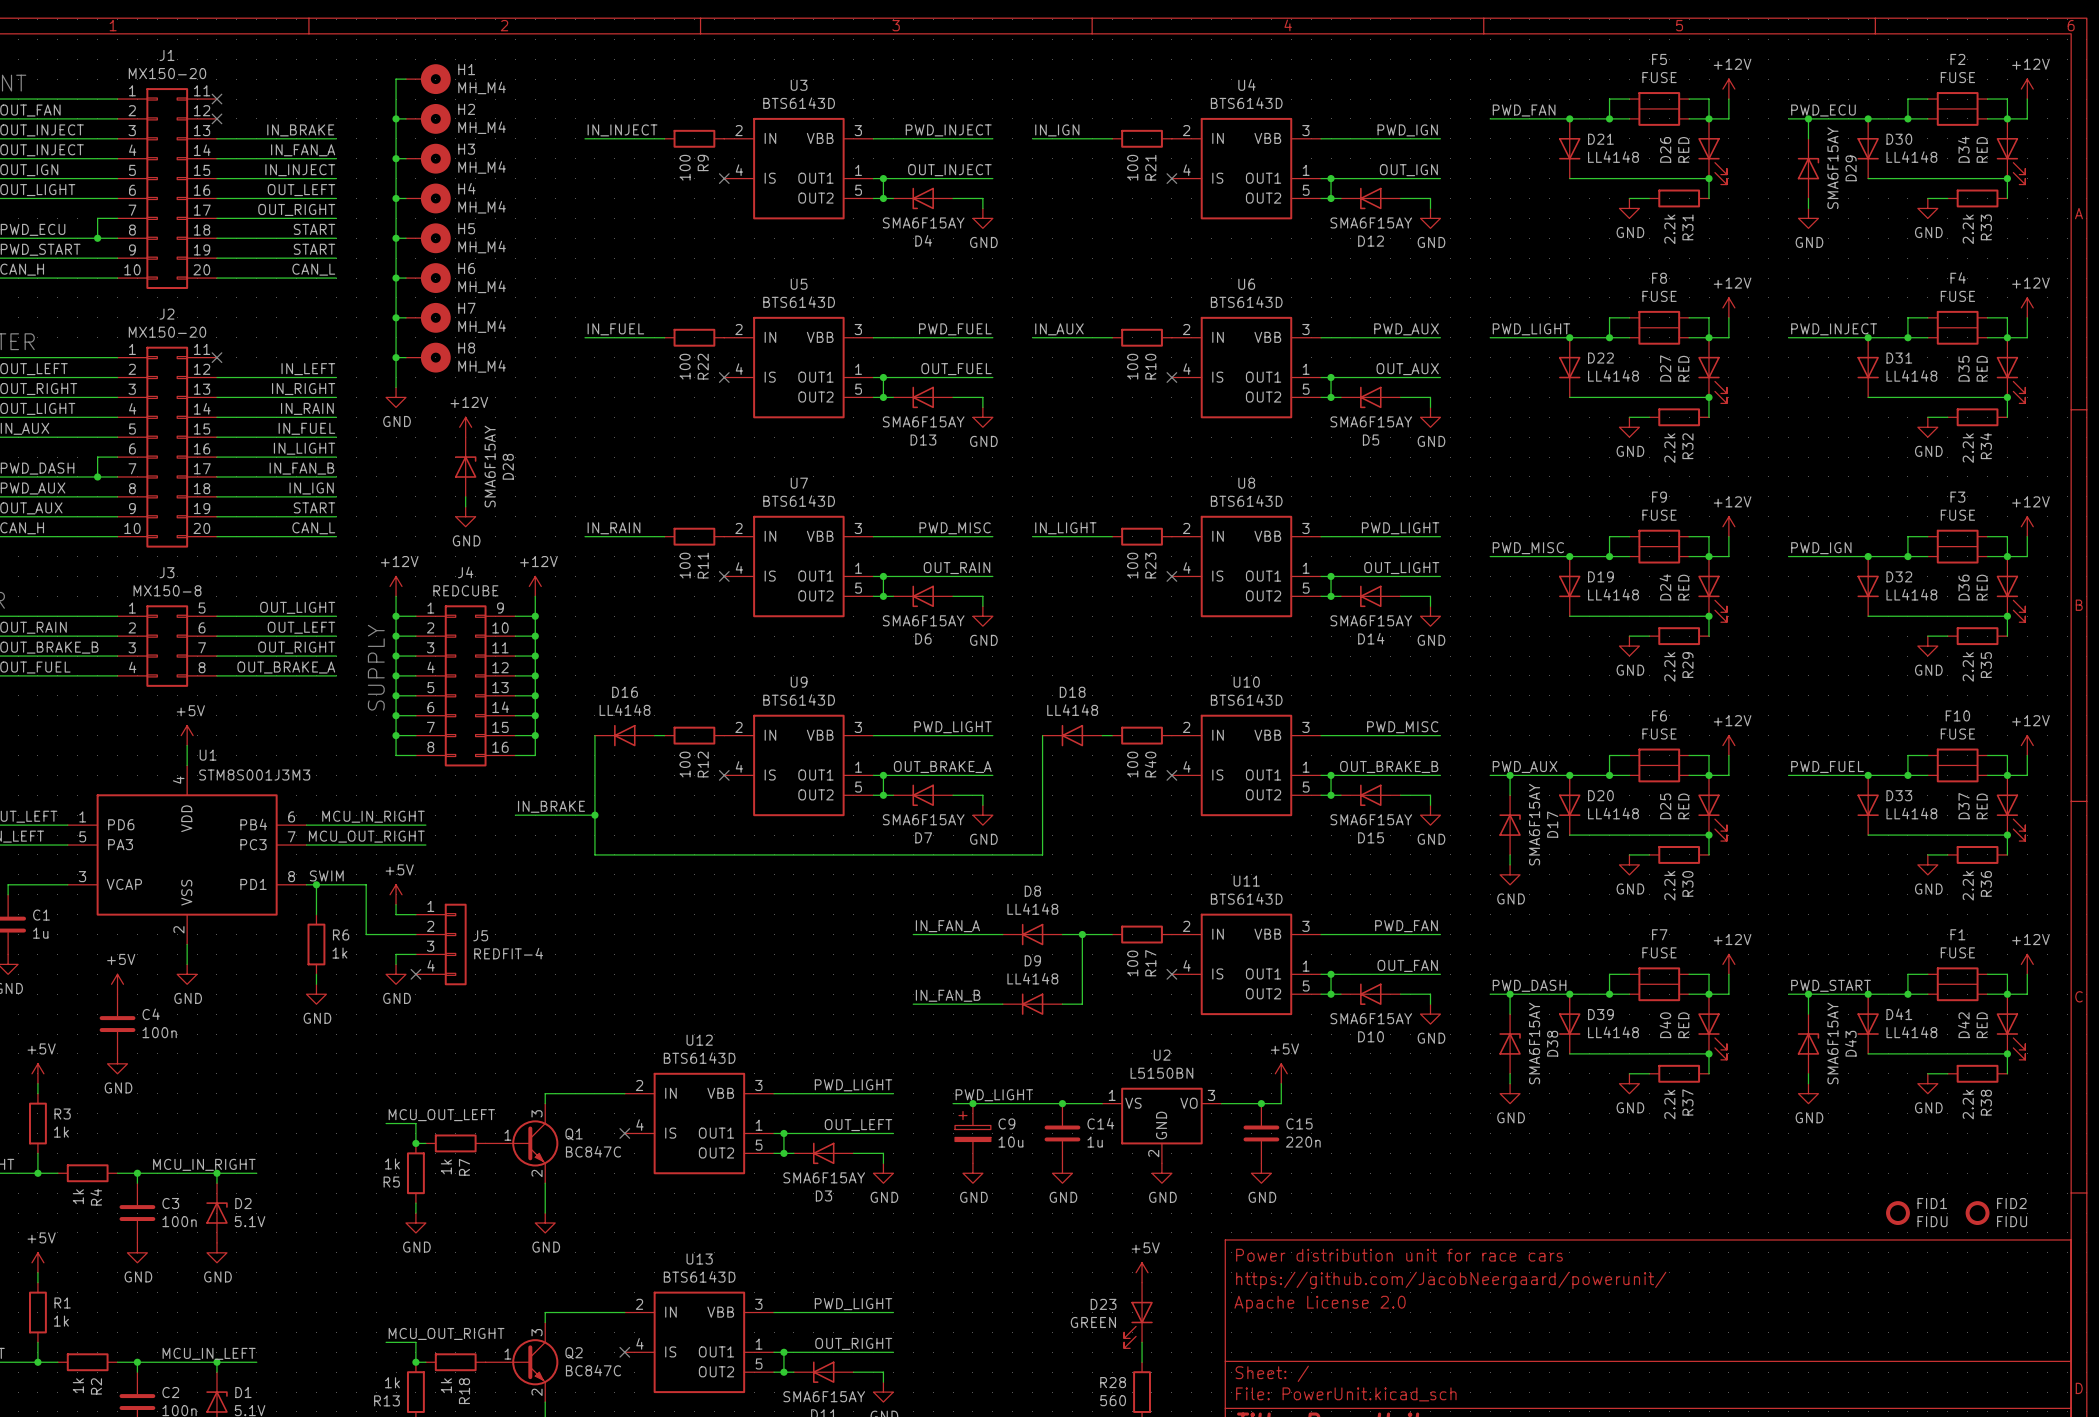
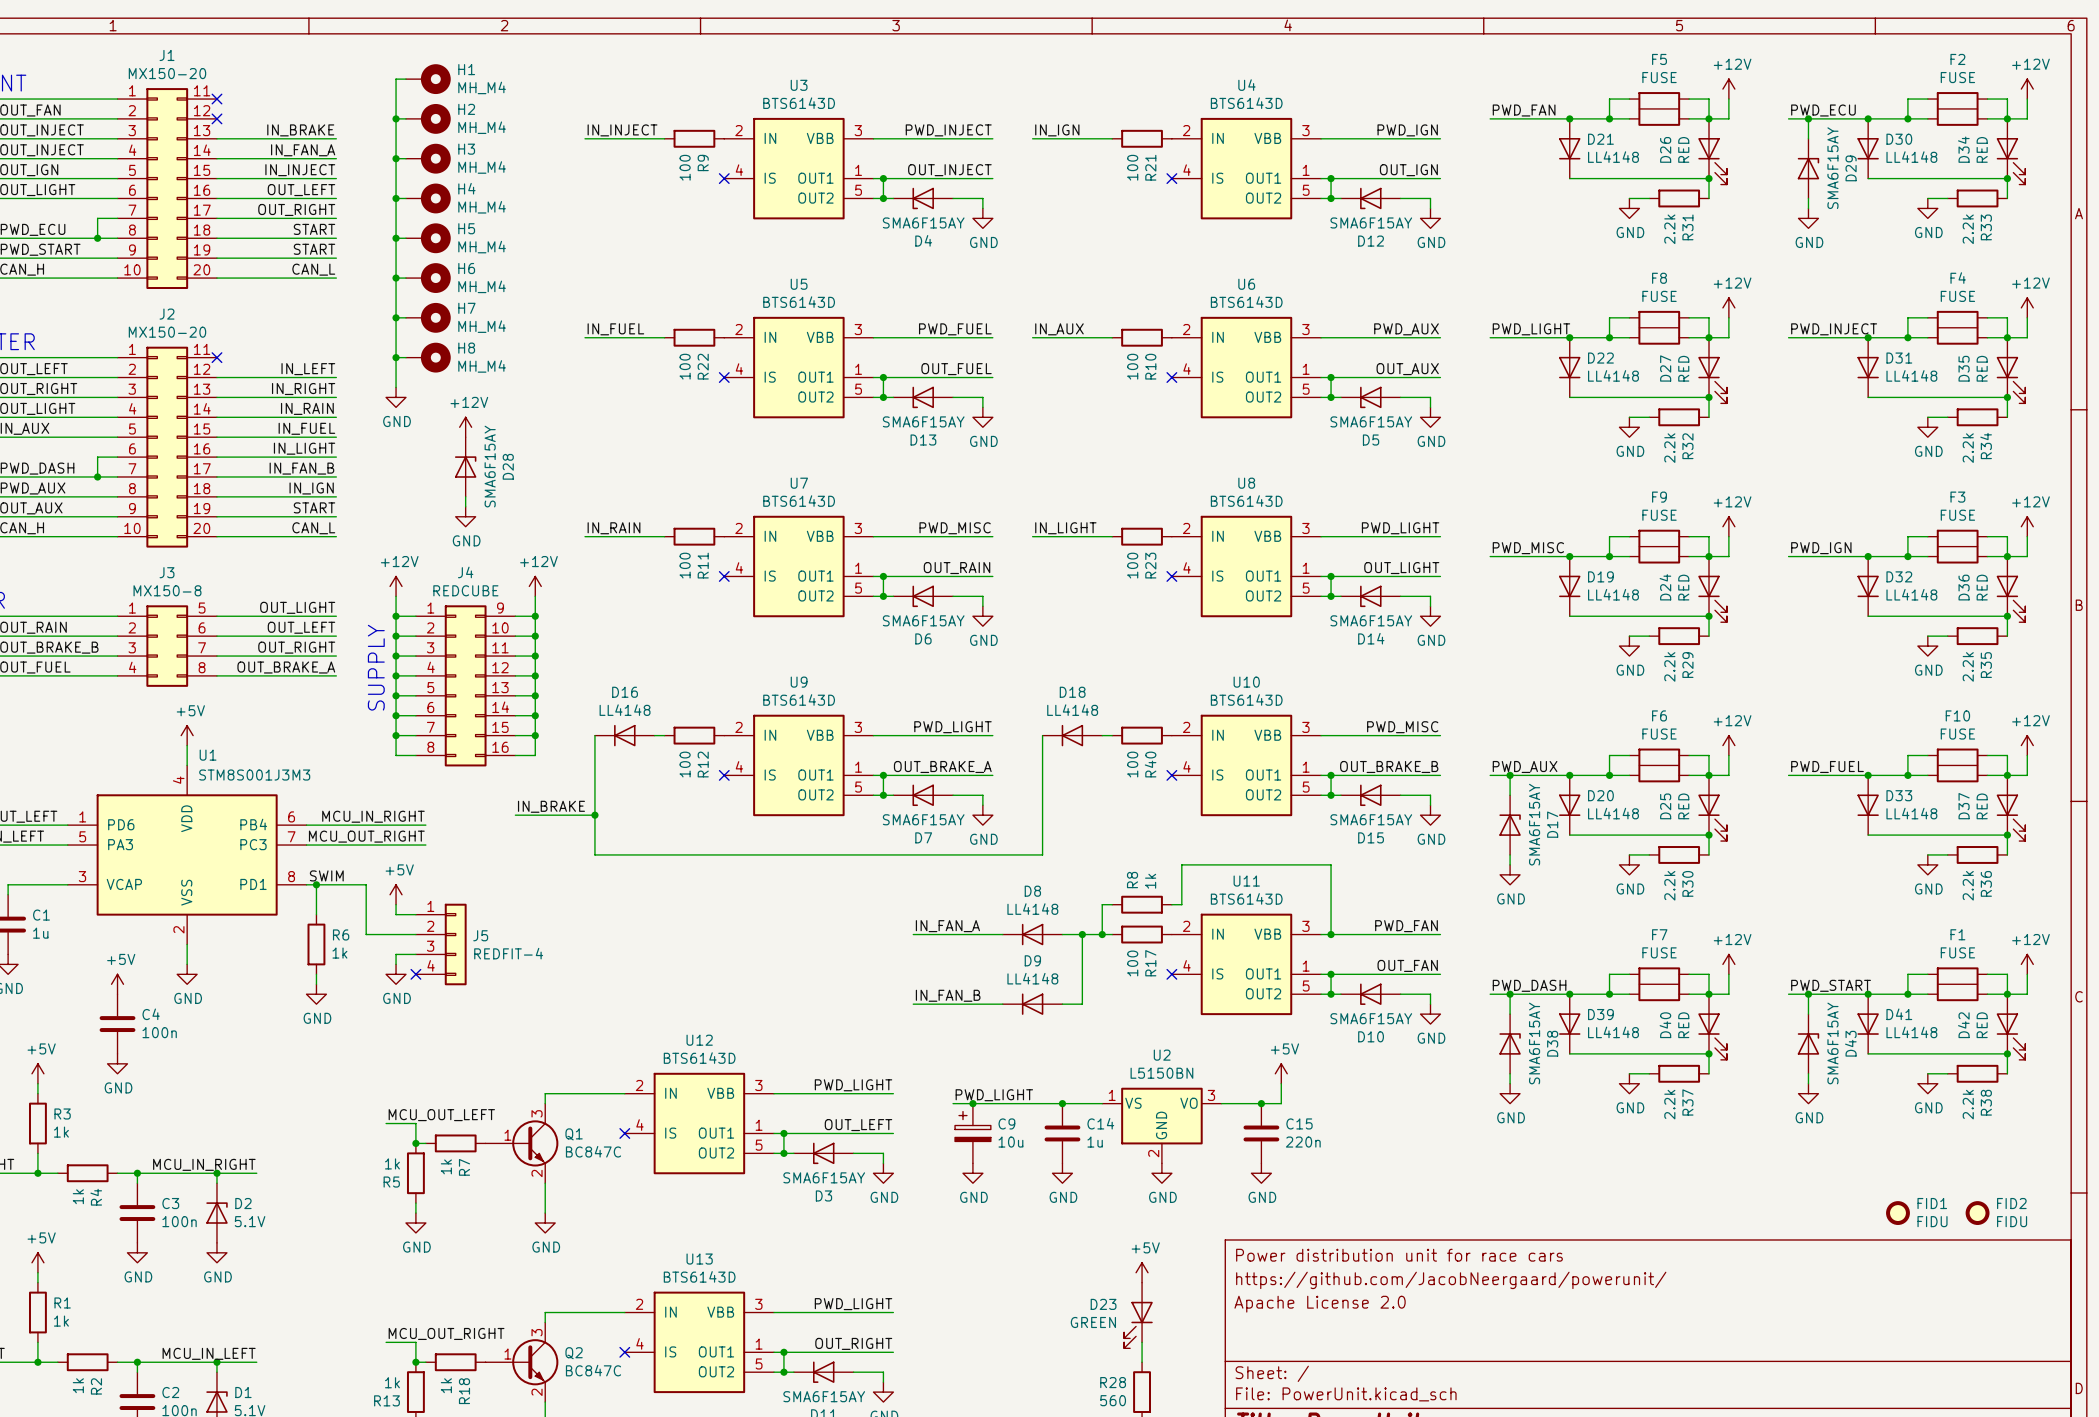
wire: none -> (1112, 904) (1102, 904) (1102, 934)
R8: none -> 1k (1142, 904)
wire: none -> (1171, 904) (1181, 904) (1181, 864) (1331, 864) (1331, 934)
junction: none -> (1102, 934)
junction: none -> (1331, 934)

